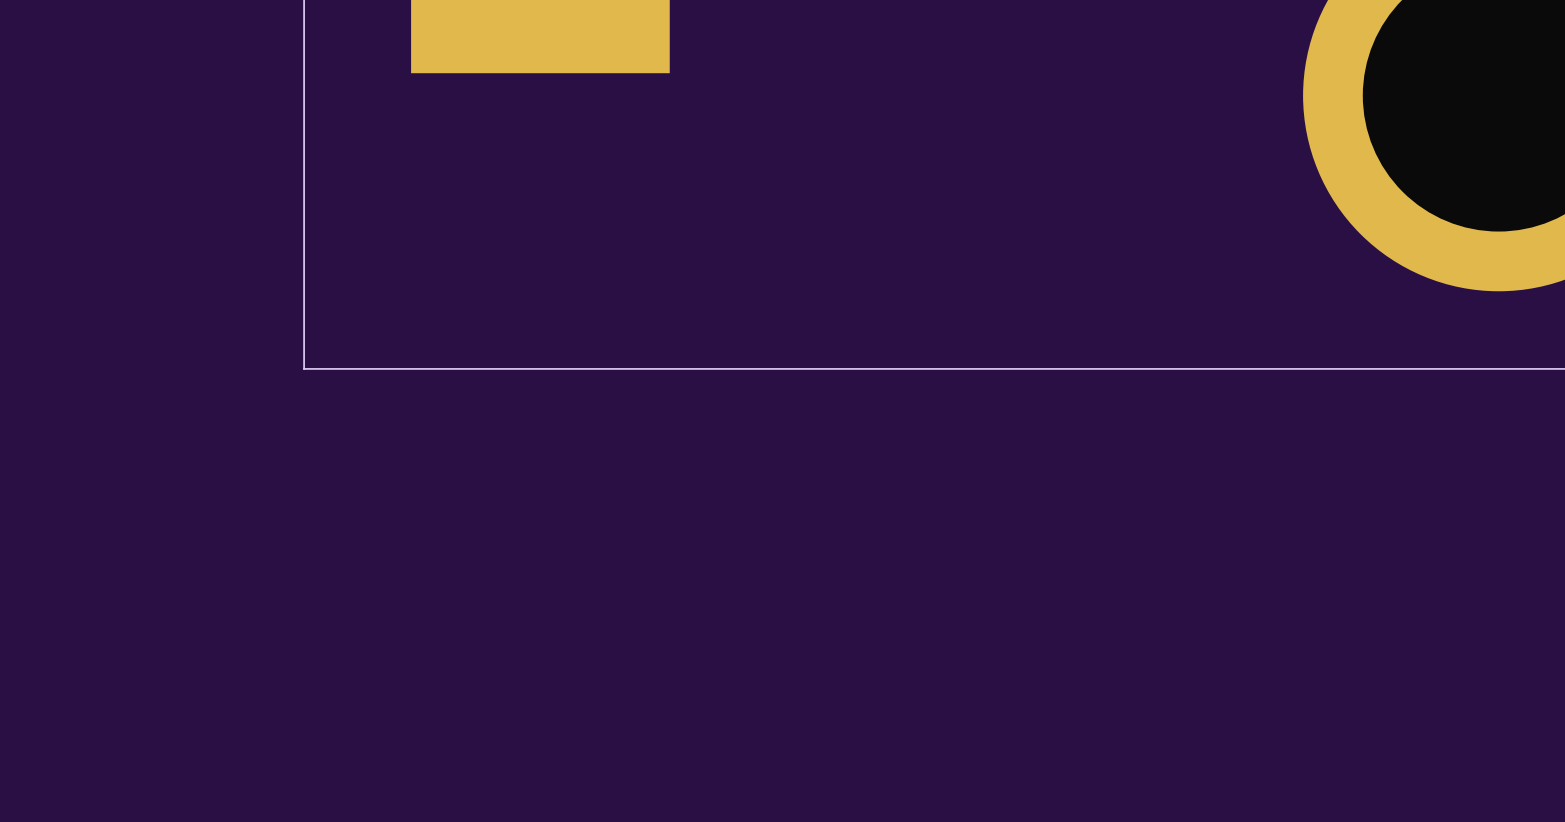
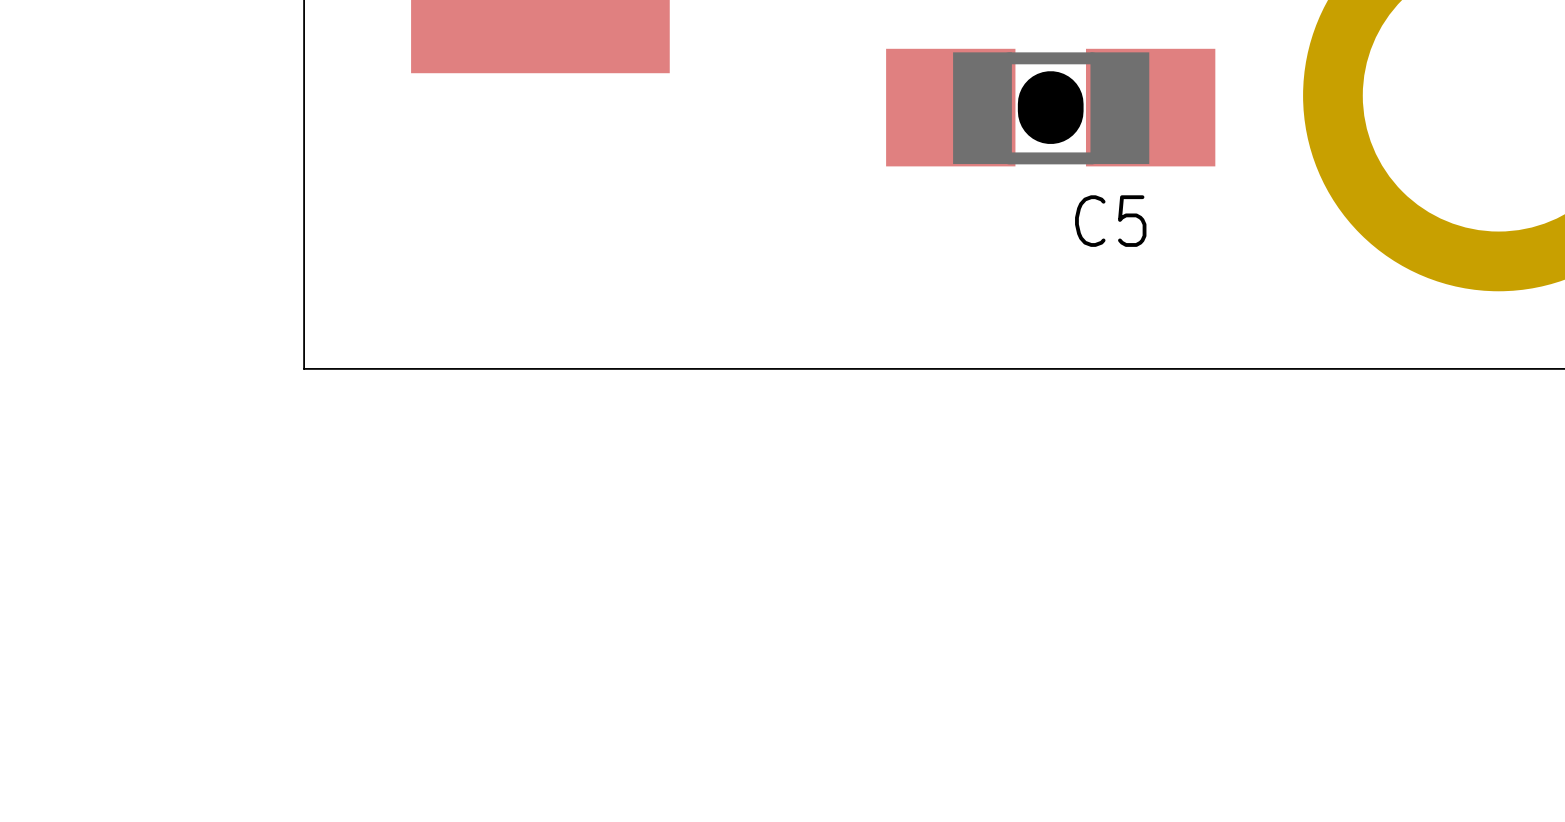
C5: none -> (1050, 107)

